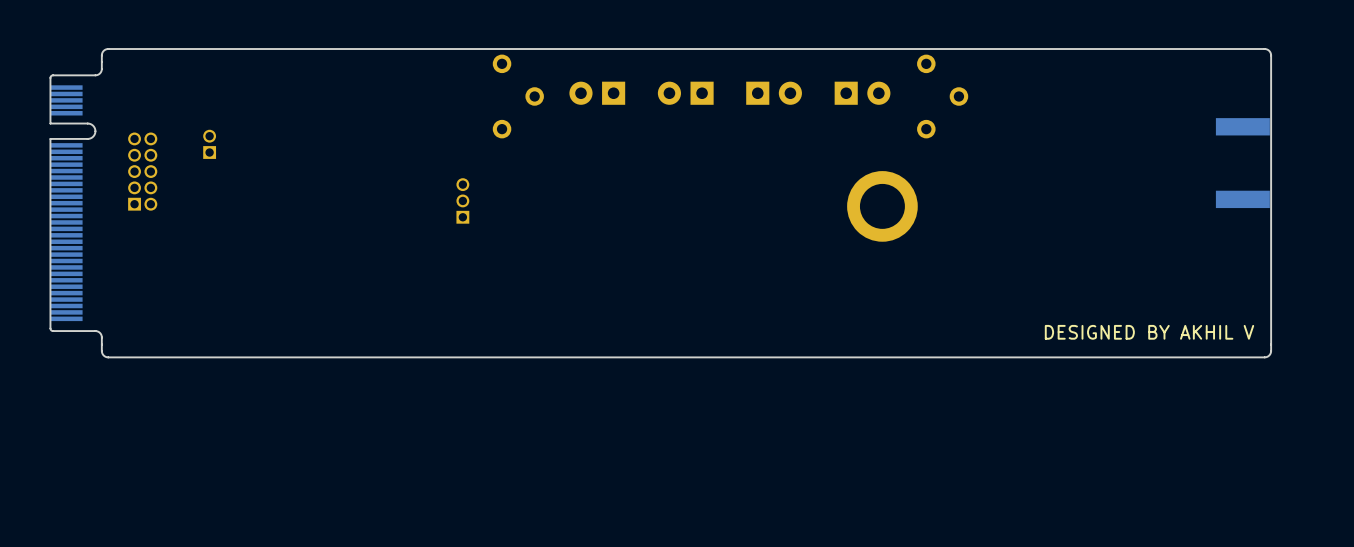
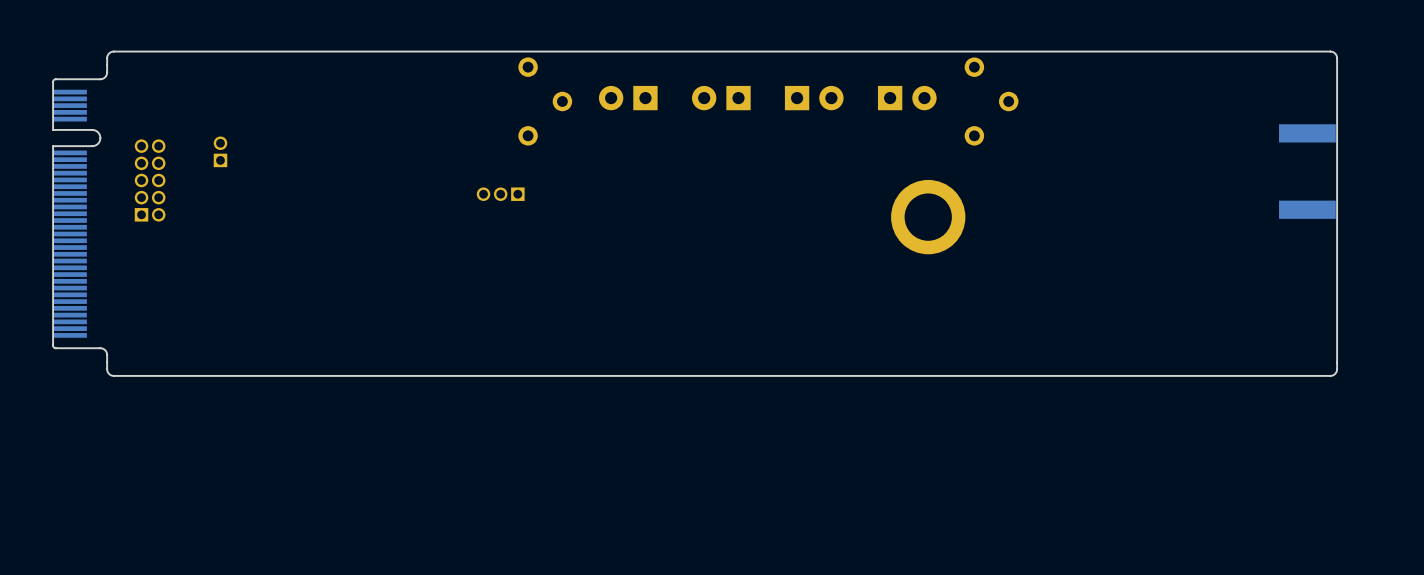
part rotation: 0° (462, 200) -> 90° counterclockwise (500, 194)
text: DESIGNED BY AKHIL V (1149, 332) -> none

